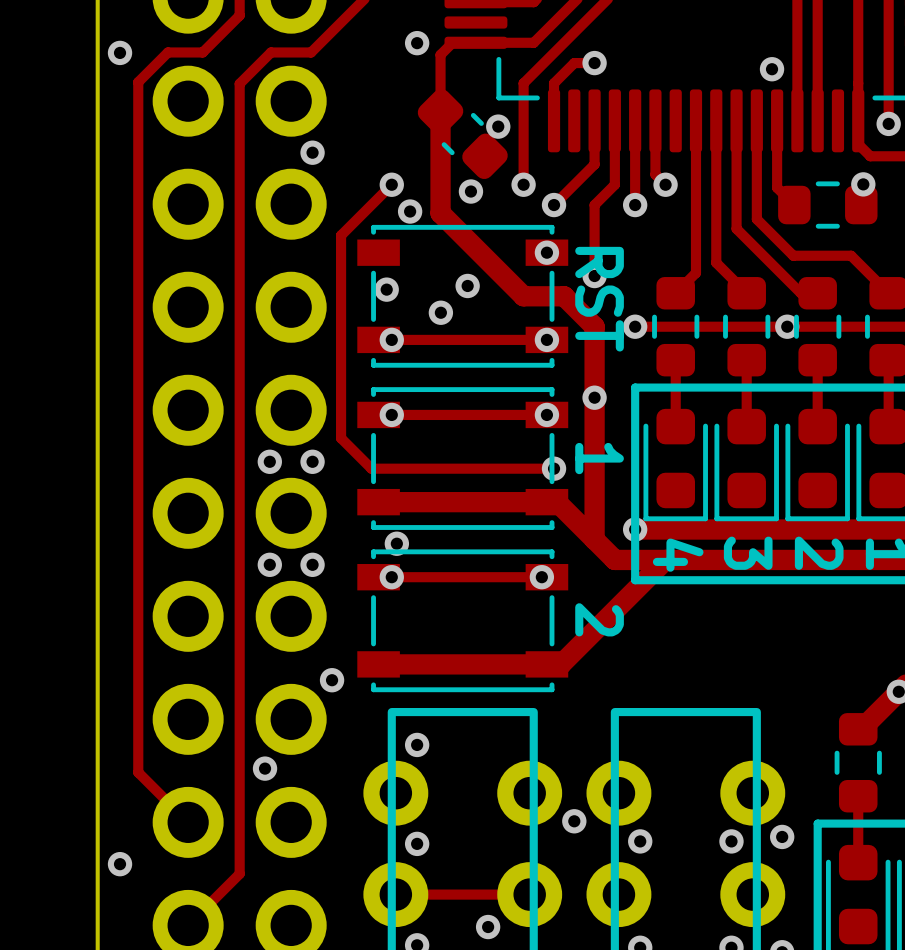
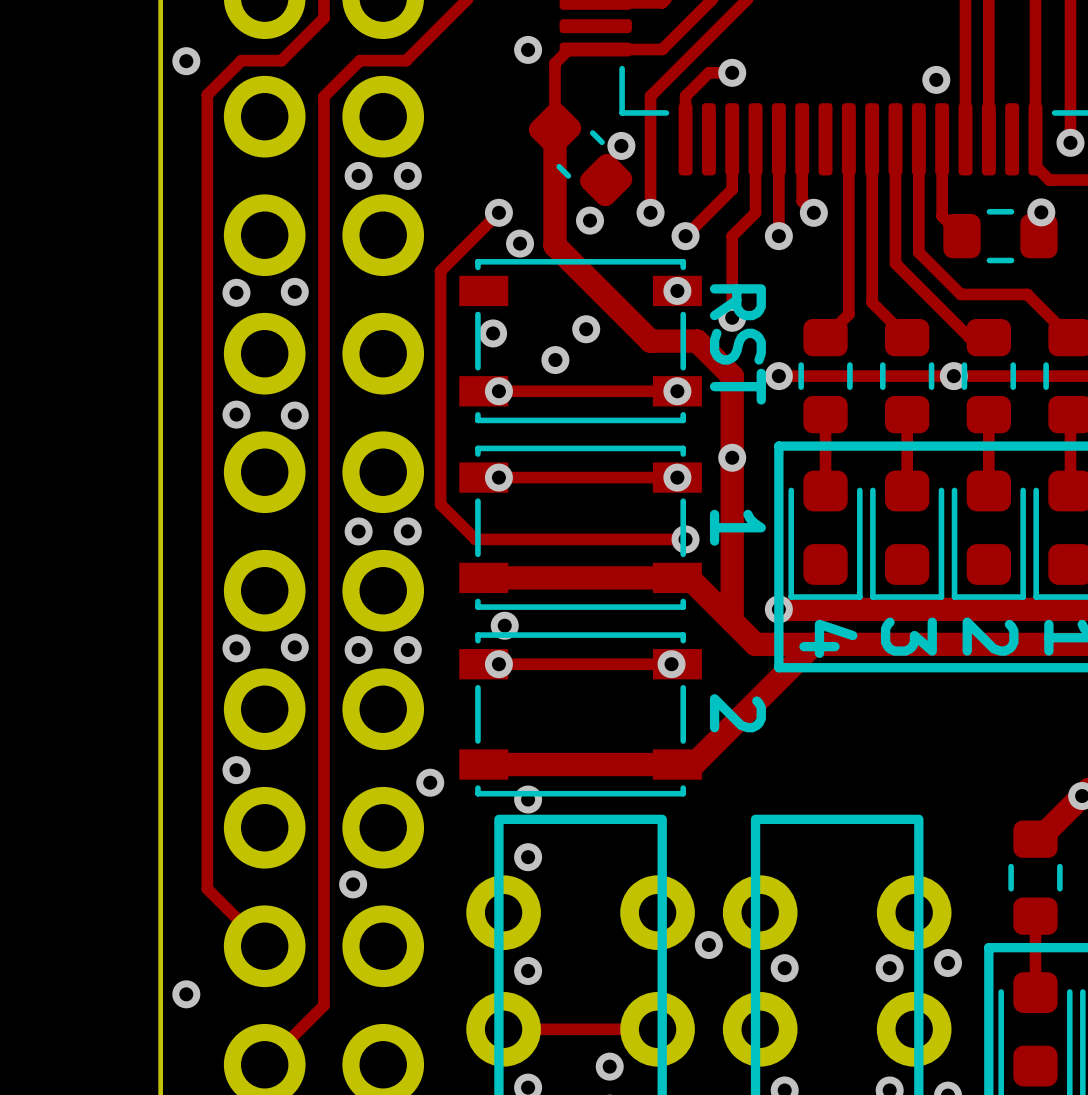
via: none -> (358, 175)
via: none -> (294, 291)
via: none -> (236, 292)
via: none -> (236, 414)
via: none -> (294, 415)
via: none -> (294, 647)
via: none -> (236, 648)
via: none -> (236, 770)
via: none -> (528, 799)

